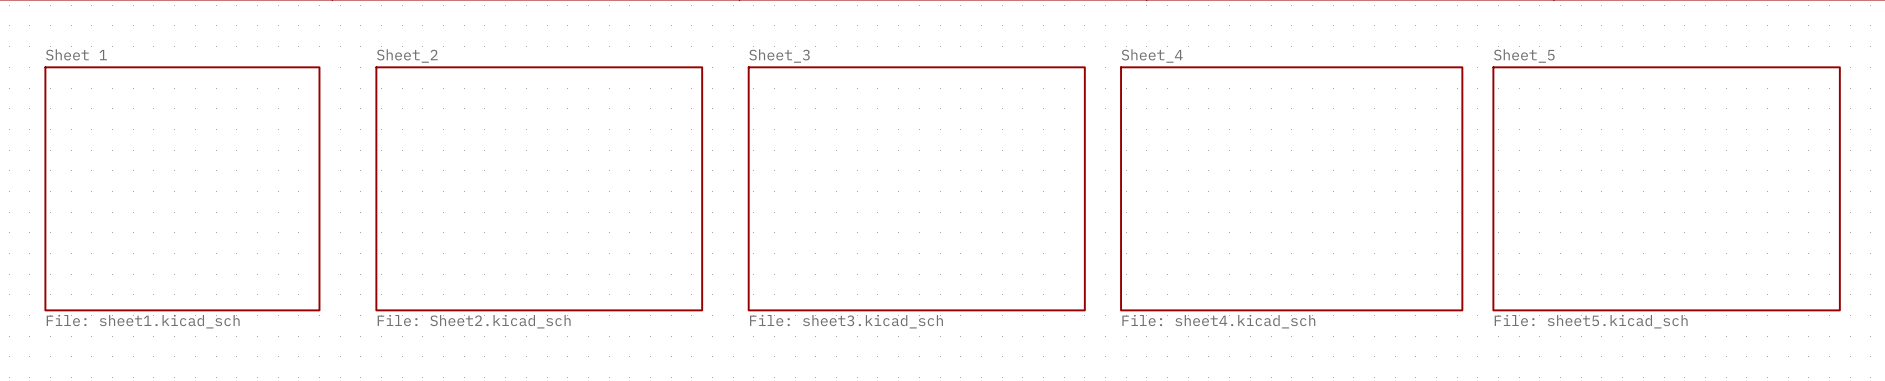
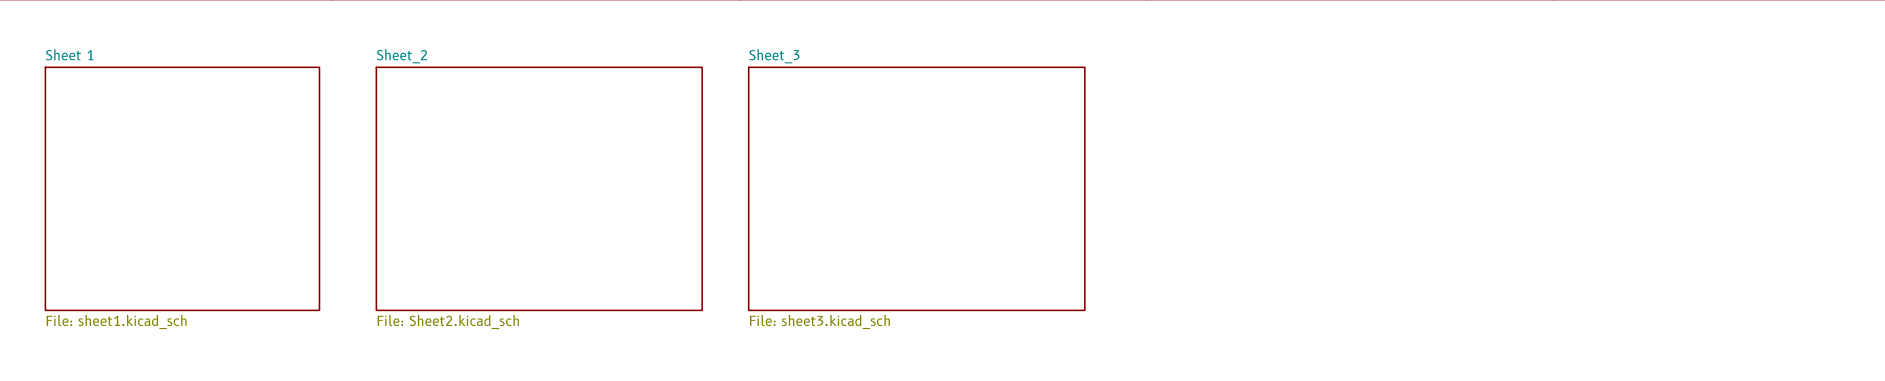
sheet Sheet_4: File: sheet4.kicad_sch (1291, 188) -> none
sheet Sheet_5: File: sheet5.kicad_sch (1666, 188) -> none

